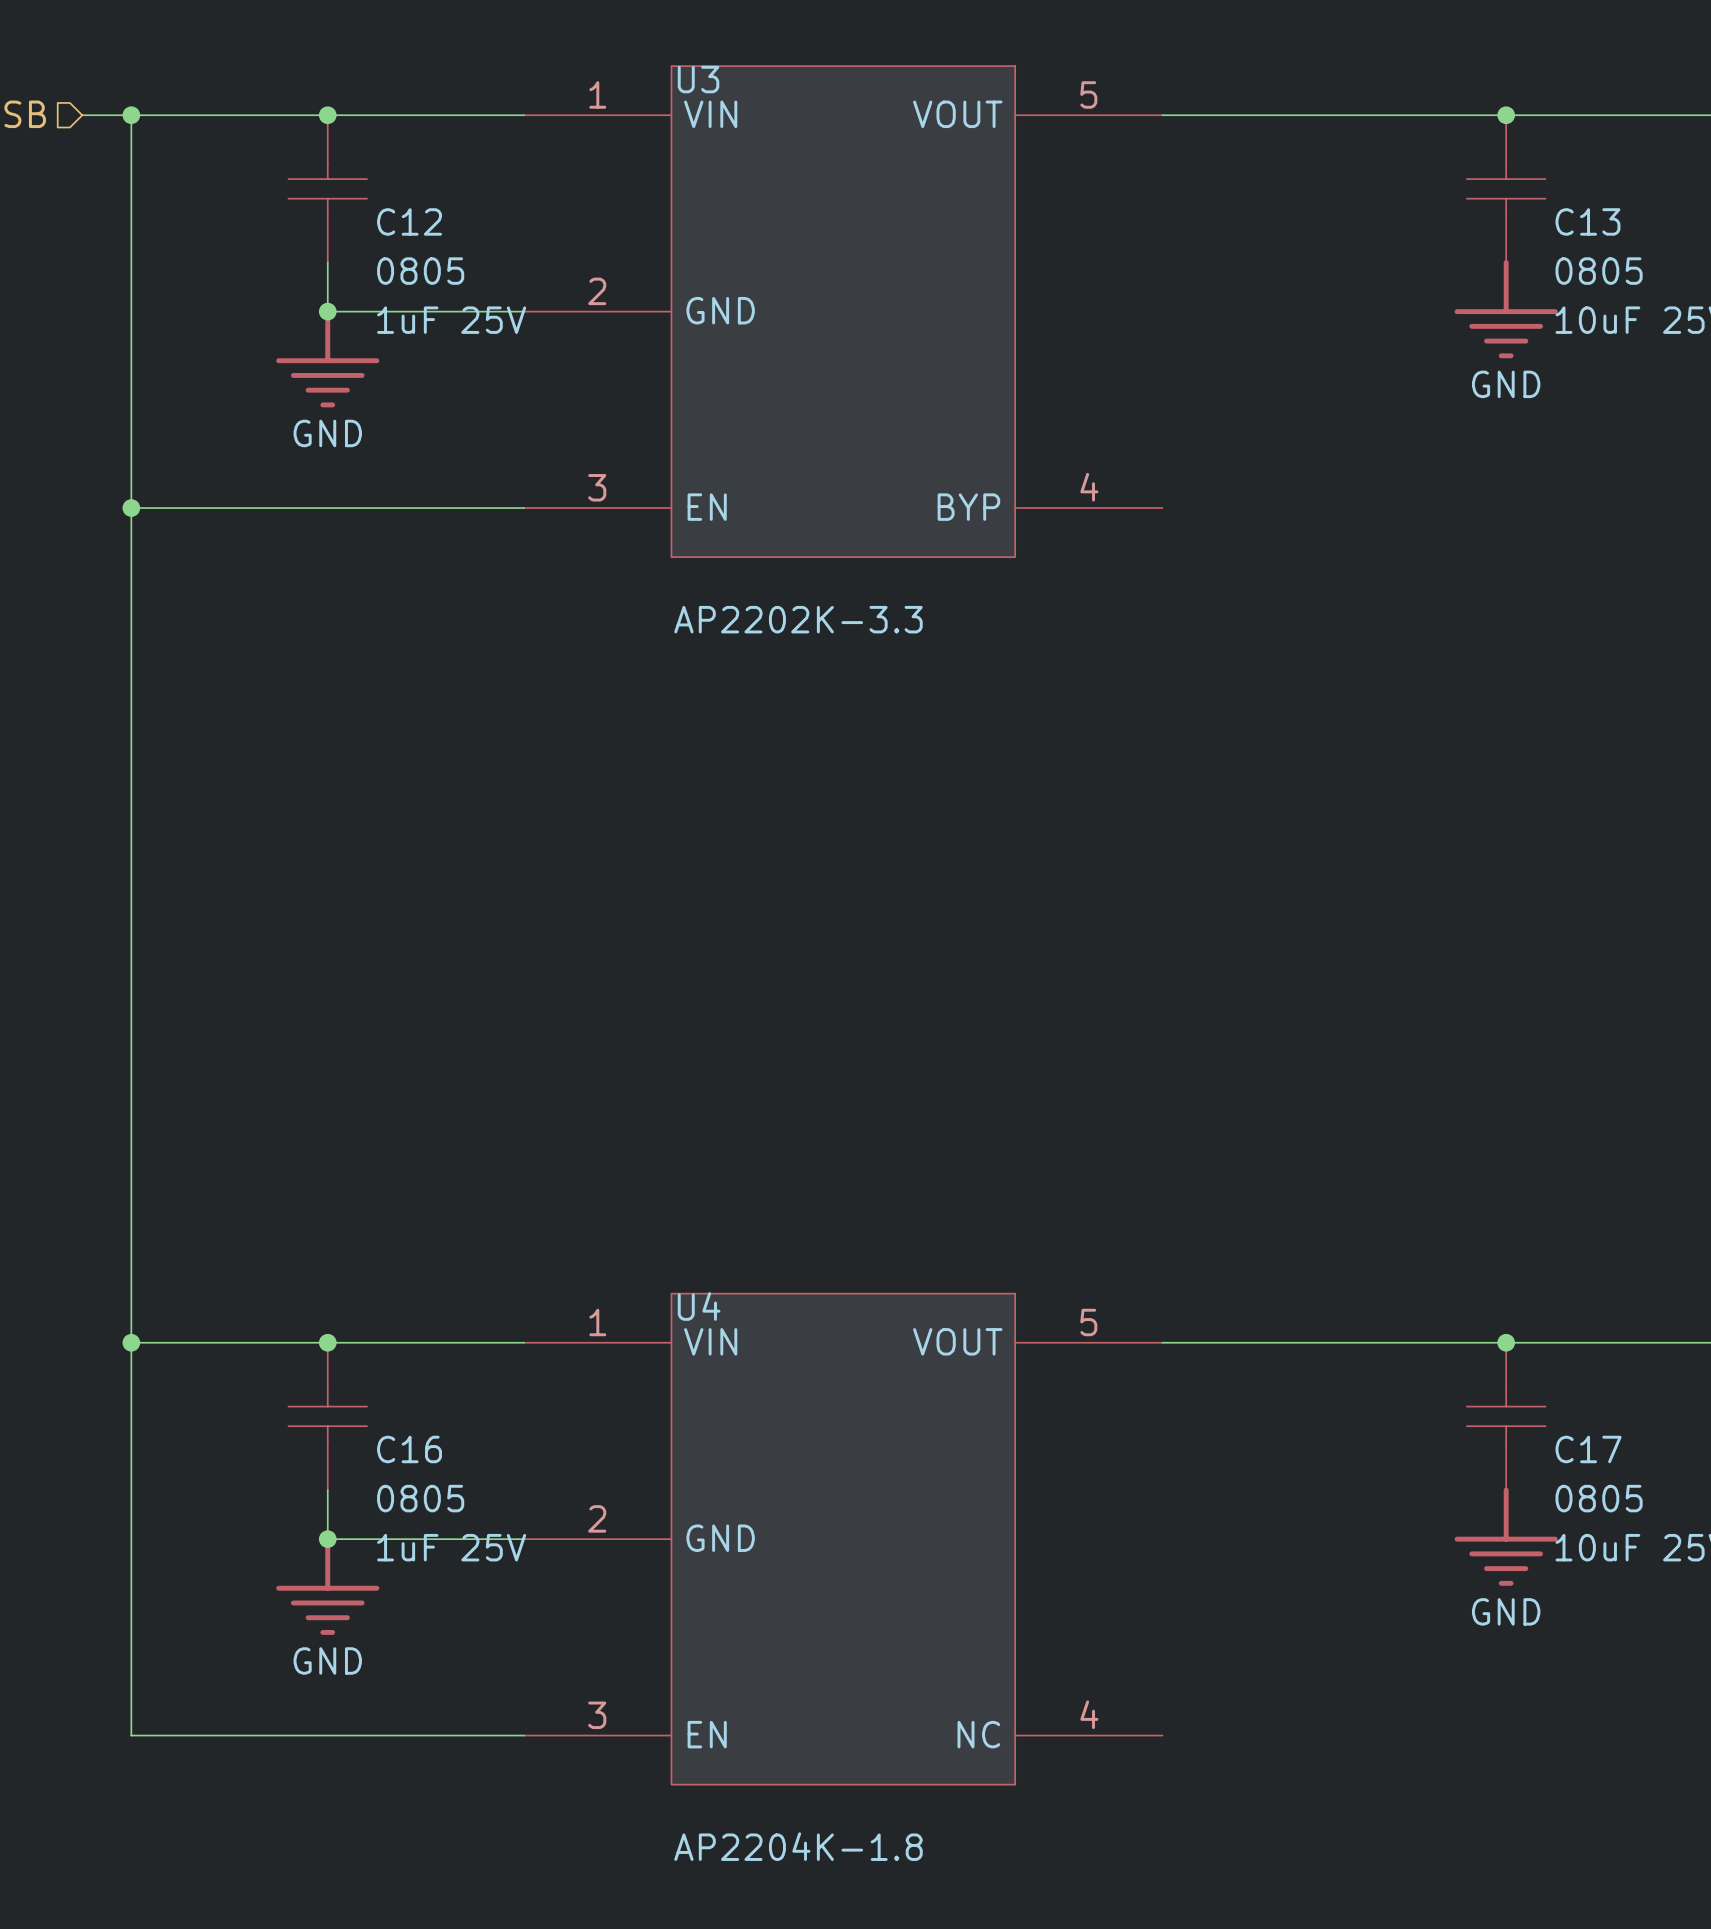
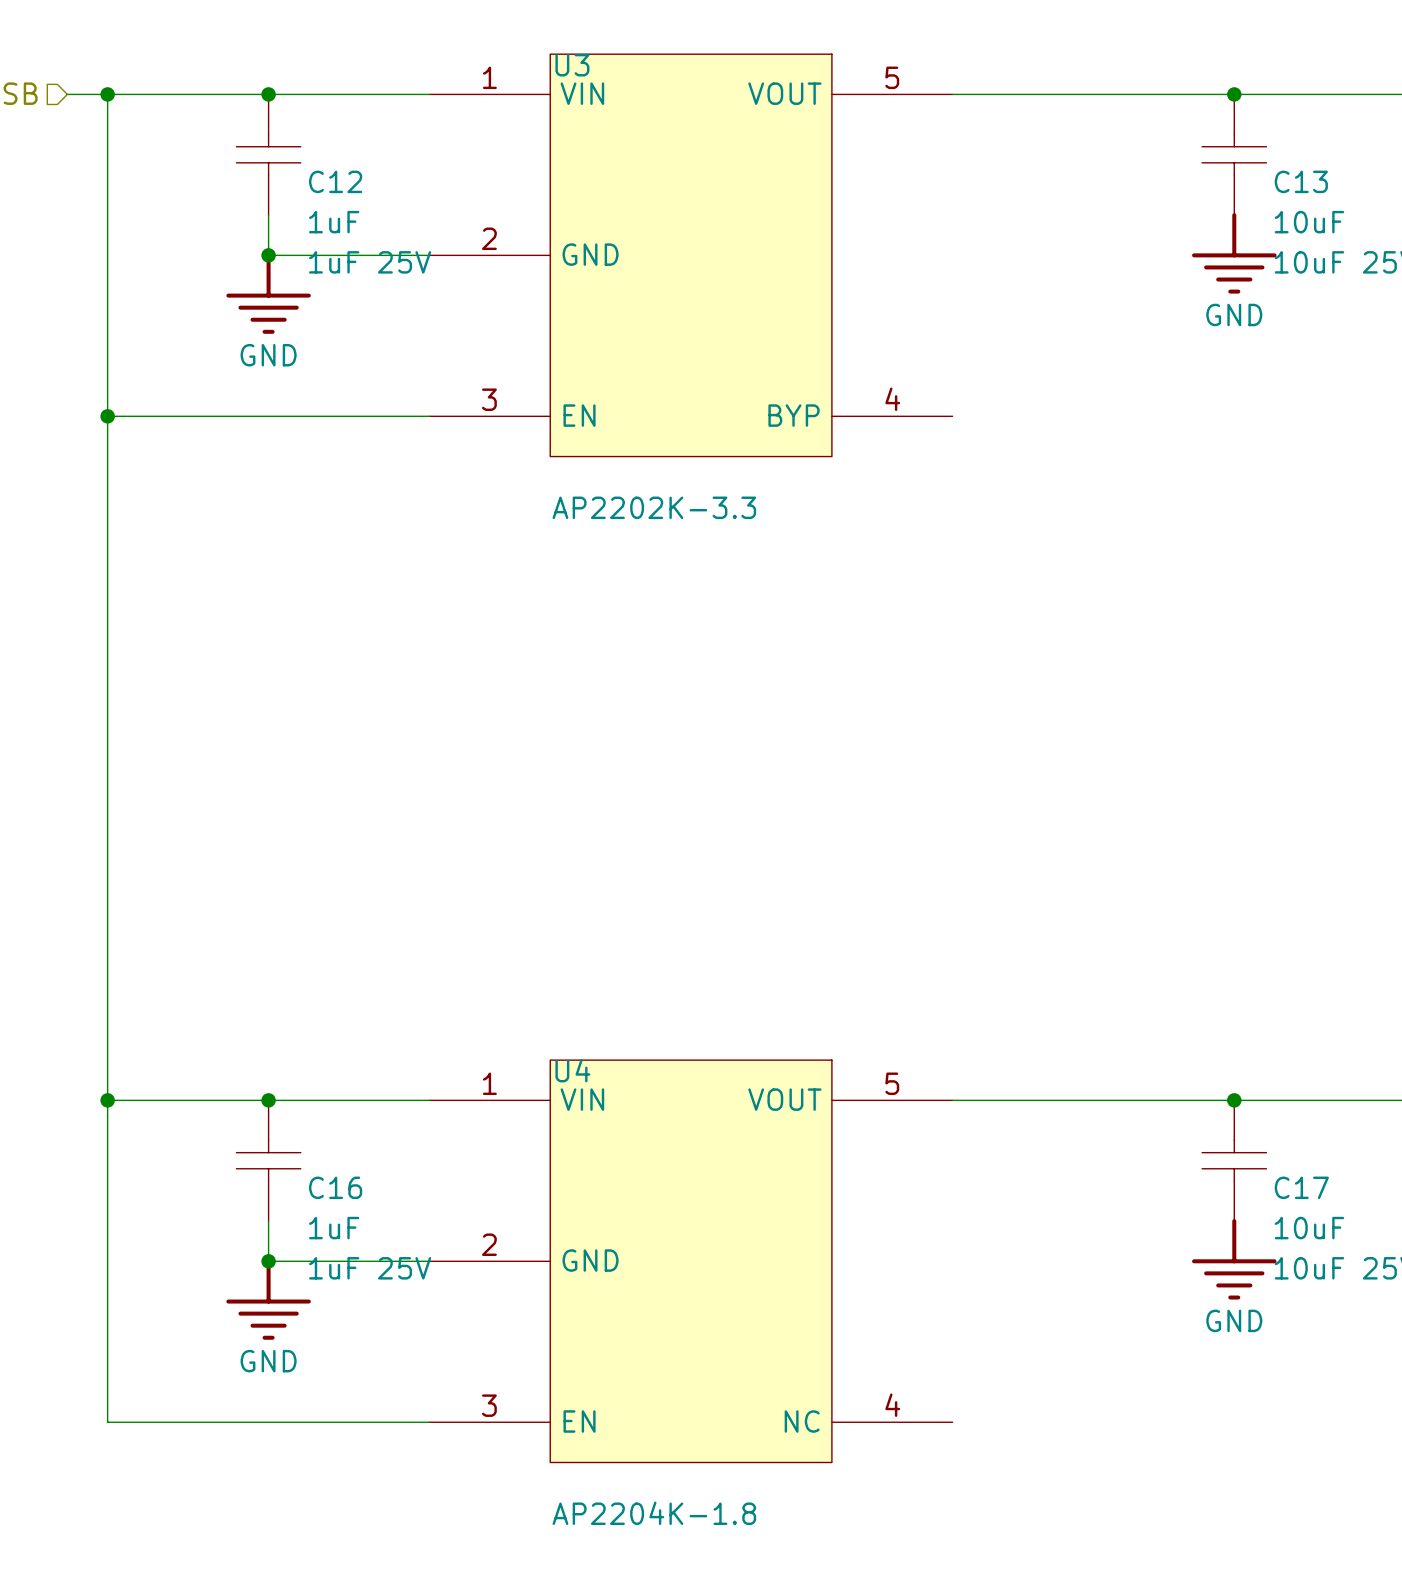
C12 value: 0805 (420, 271) -> 1uF (334, 222)
C13 value: 0805 (1599, 271) -> 10uF (1309, 222)
C16 value: 0805 (420, 1498) -> 1uF (334, 1228)
C17 value: 0805 (1599, 1498) -> 10uF (1309, 1228)

